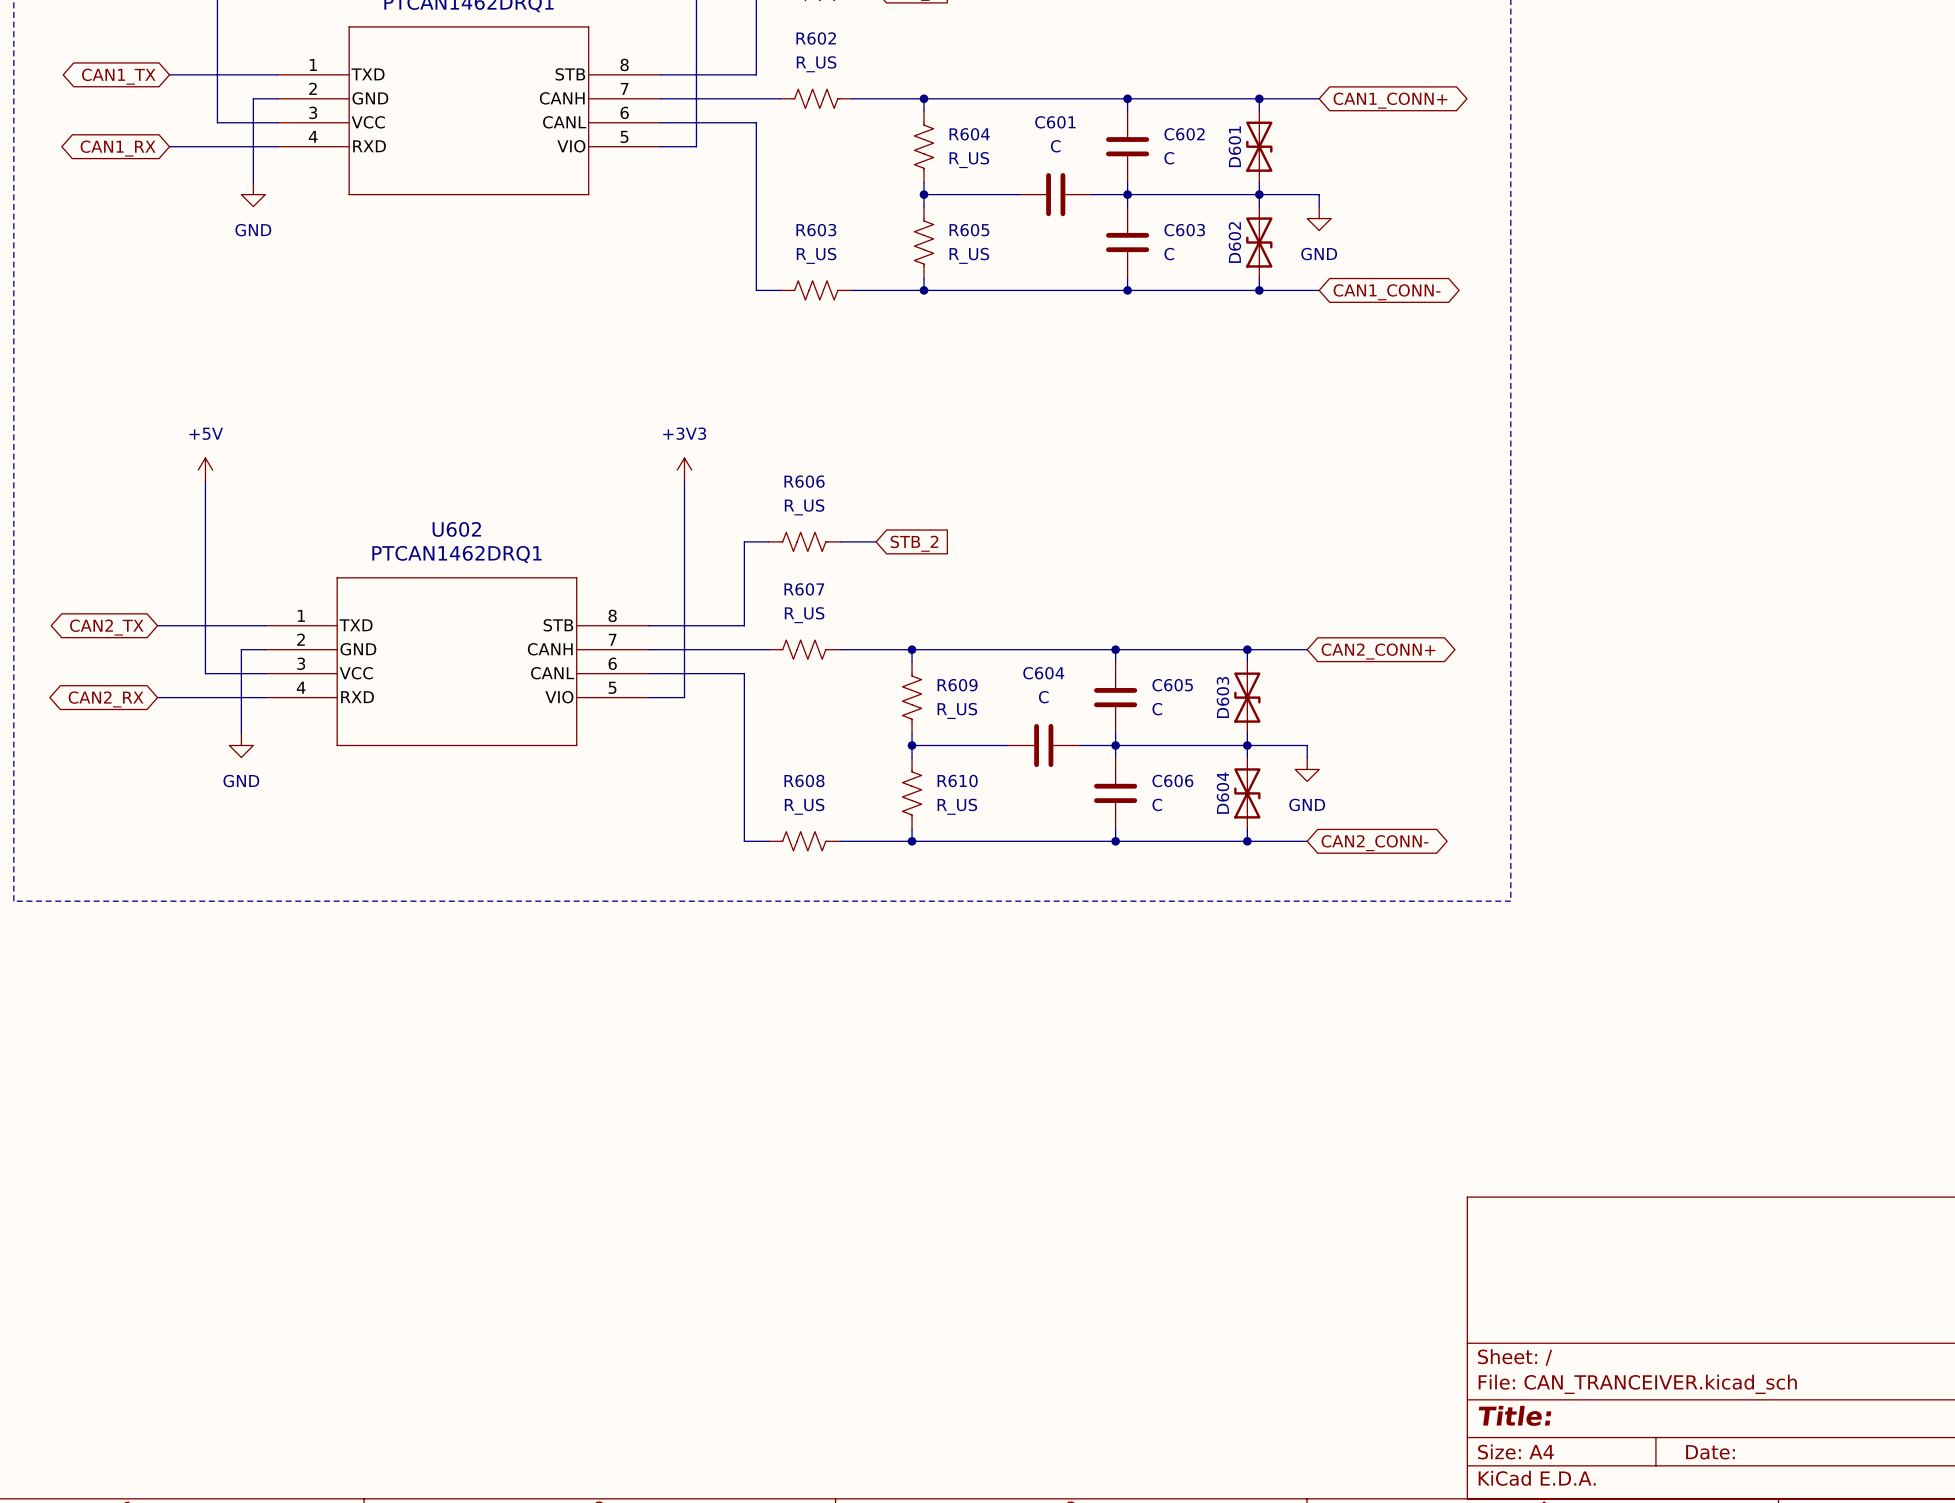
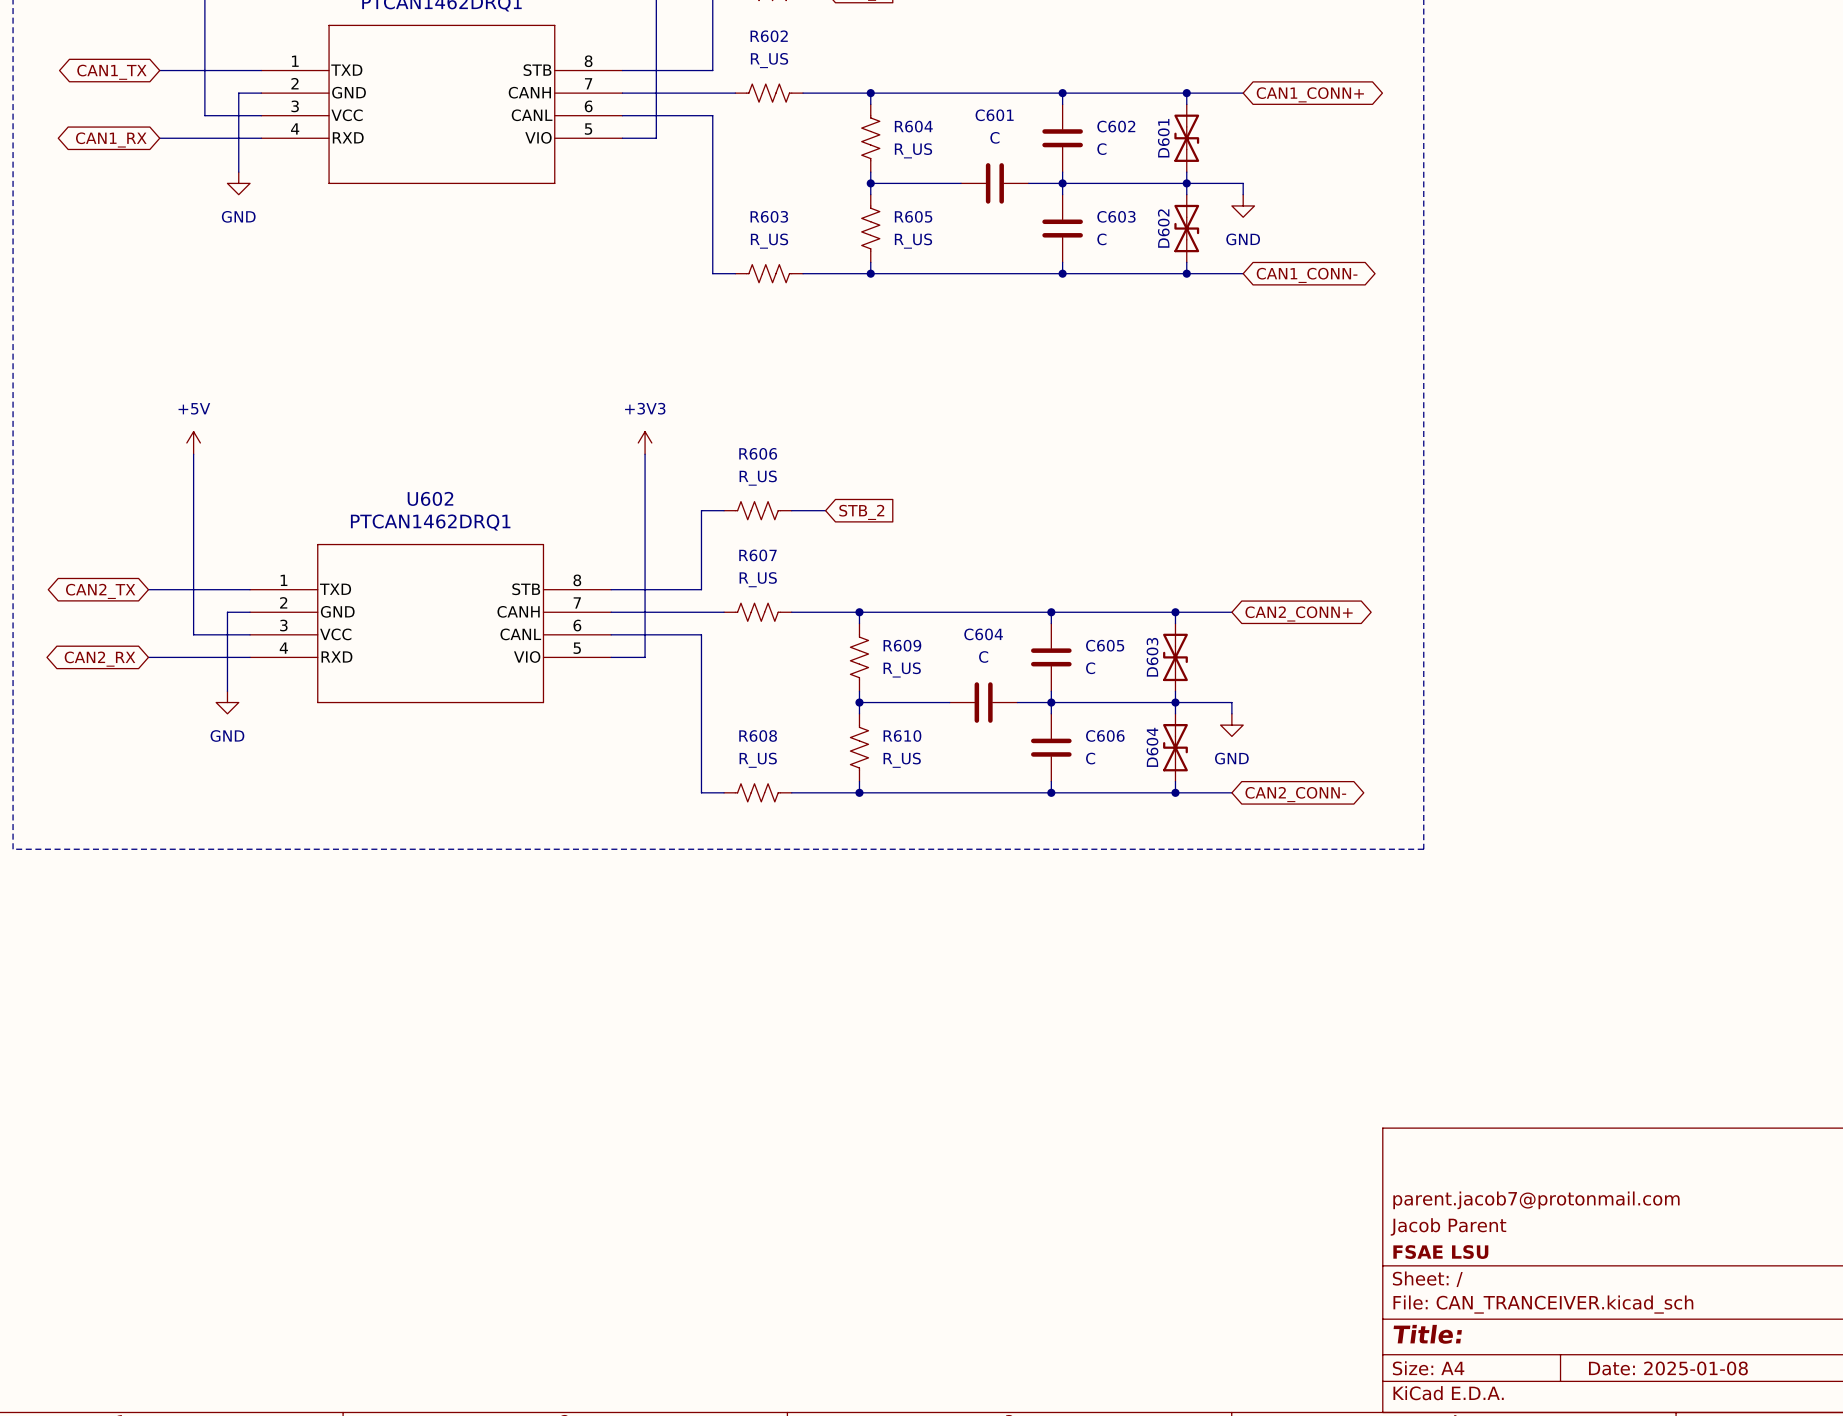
title block: none -> parent.jacob7@protonmail.com (1536, 1200)
title block: none -> Jacob Parent (1448, 1226)
title block: none -> FSAE LSU (1440, 1252)
title block: Date: (1710, 1452) -> Date: 2025-01-08 (1668, 1368)

